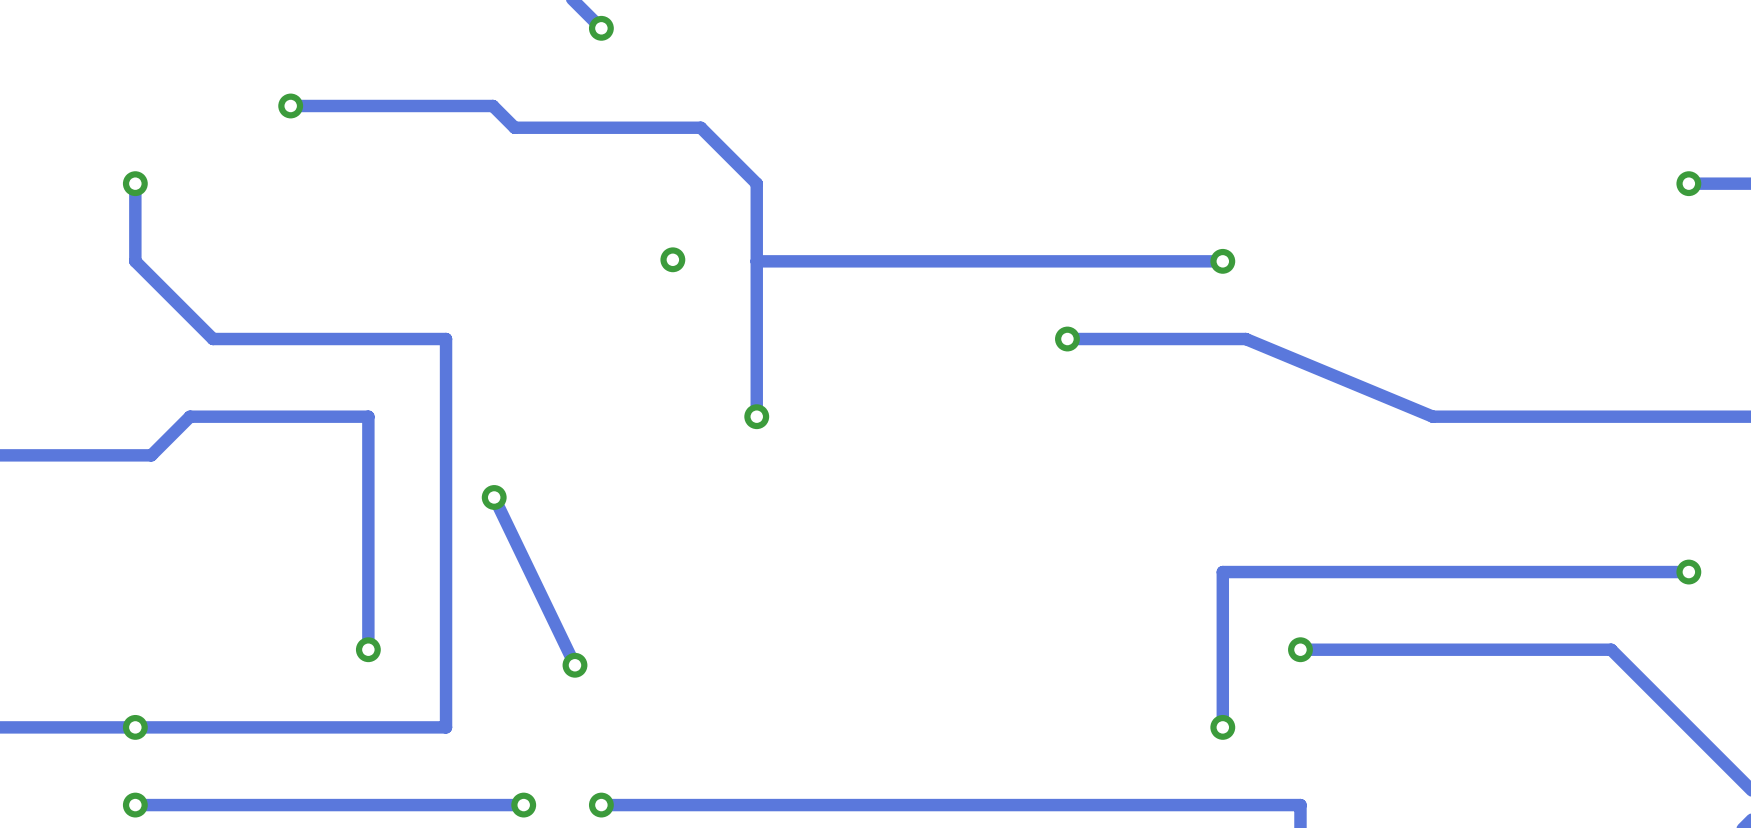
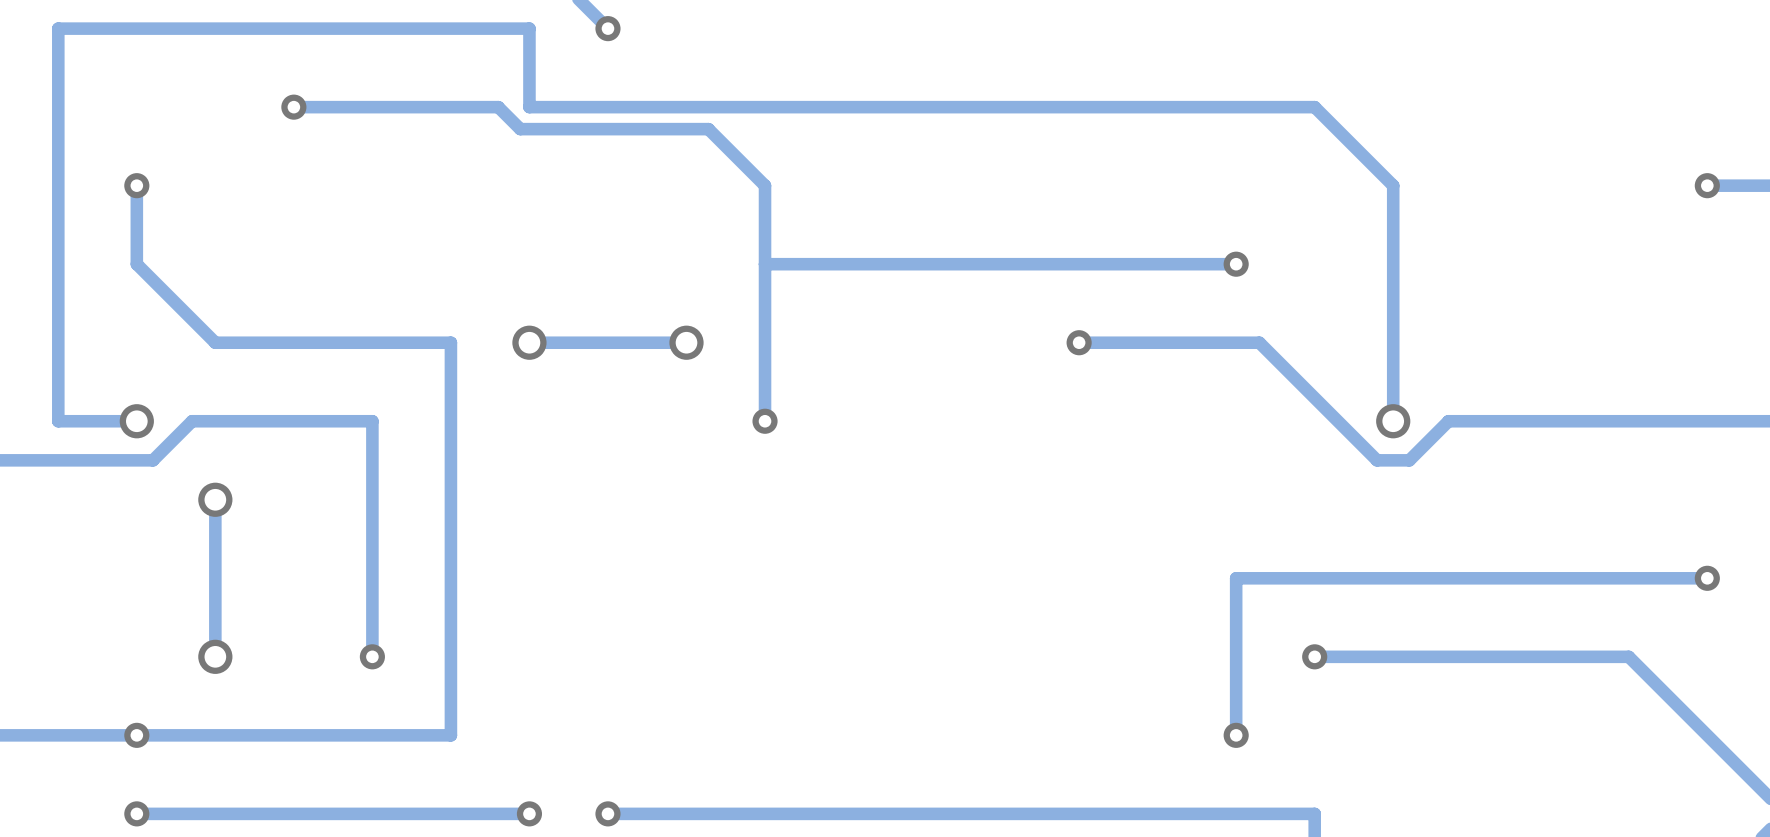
via: (672, 259) -> none
via: none -> (529, 342)
track: none -> (686, 342) (529, 342)
via: none -> (686, 342)
track: (1245, 339) (1432, 416) -> (1259, 342) (1377, 460) (1409, 460) (1448, 421)
via: none -> (136, 421)
track: none -> (1393, 421) (1393, 185) (1314, 107) (529, 107) (529, 28) (58, 28) (58, 421) (136, 421)
via: none -> (1393, 421)
track: none -> (215, 499) (215, 656)
via: none -> (215, 499)
track: (494, 497) (574, 665) -> none
via: (494, 497) -> none
via: none -> (215, 656)
via: (574, 665) -> none

